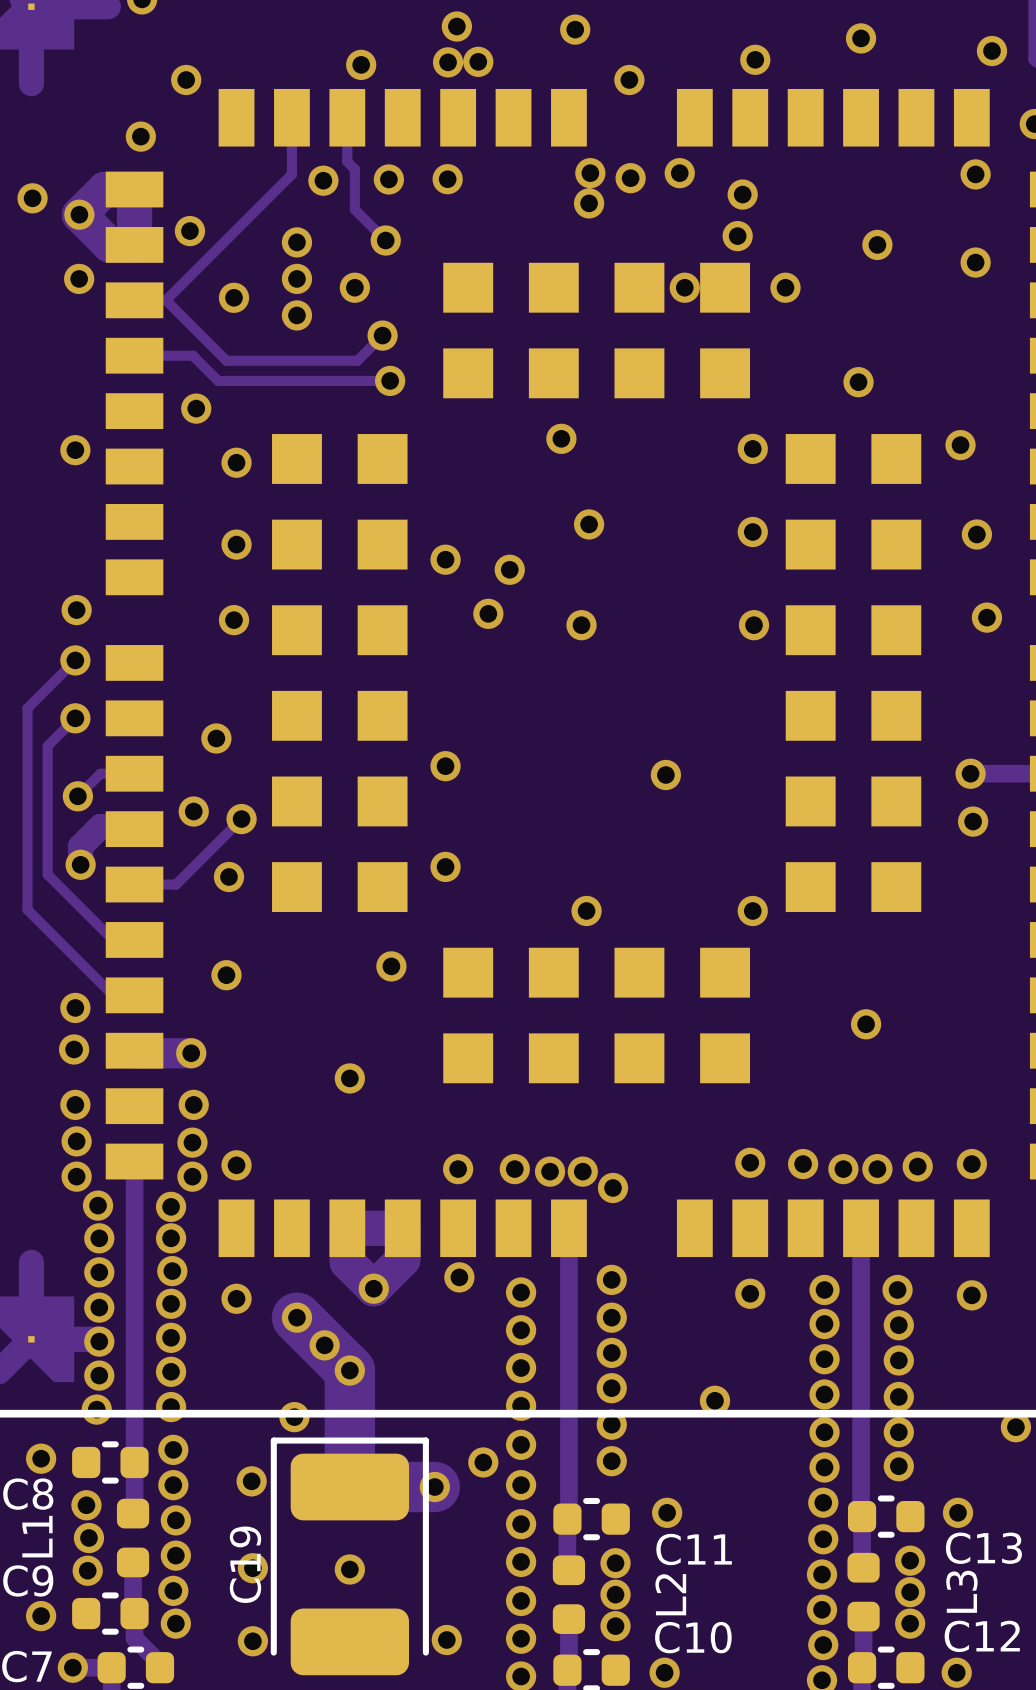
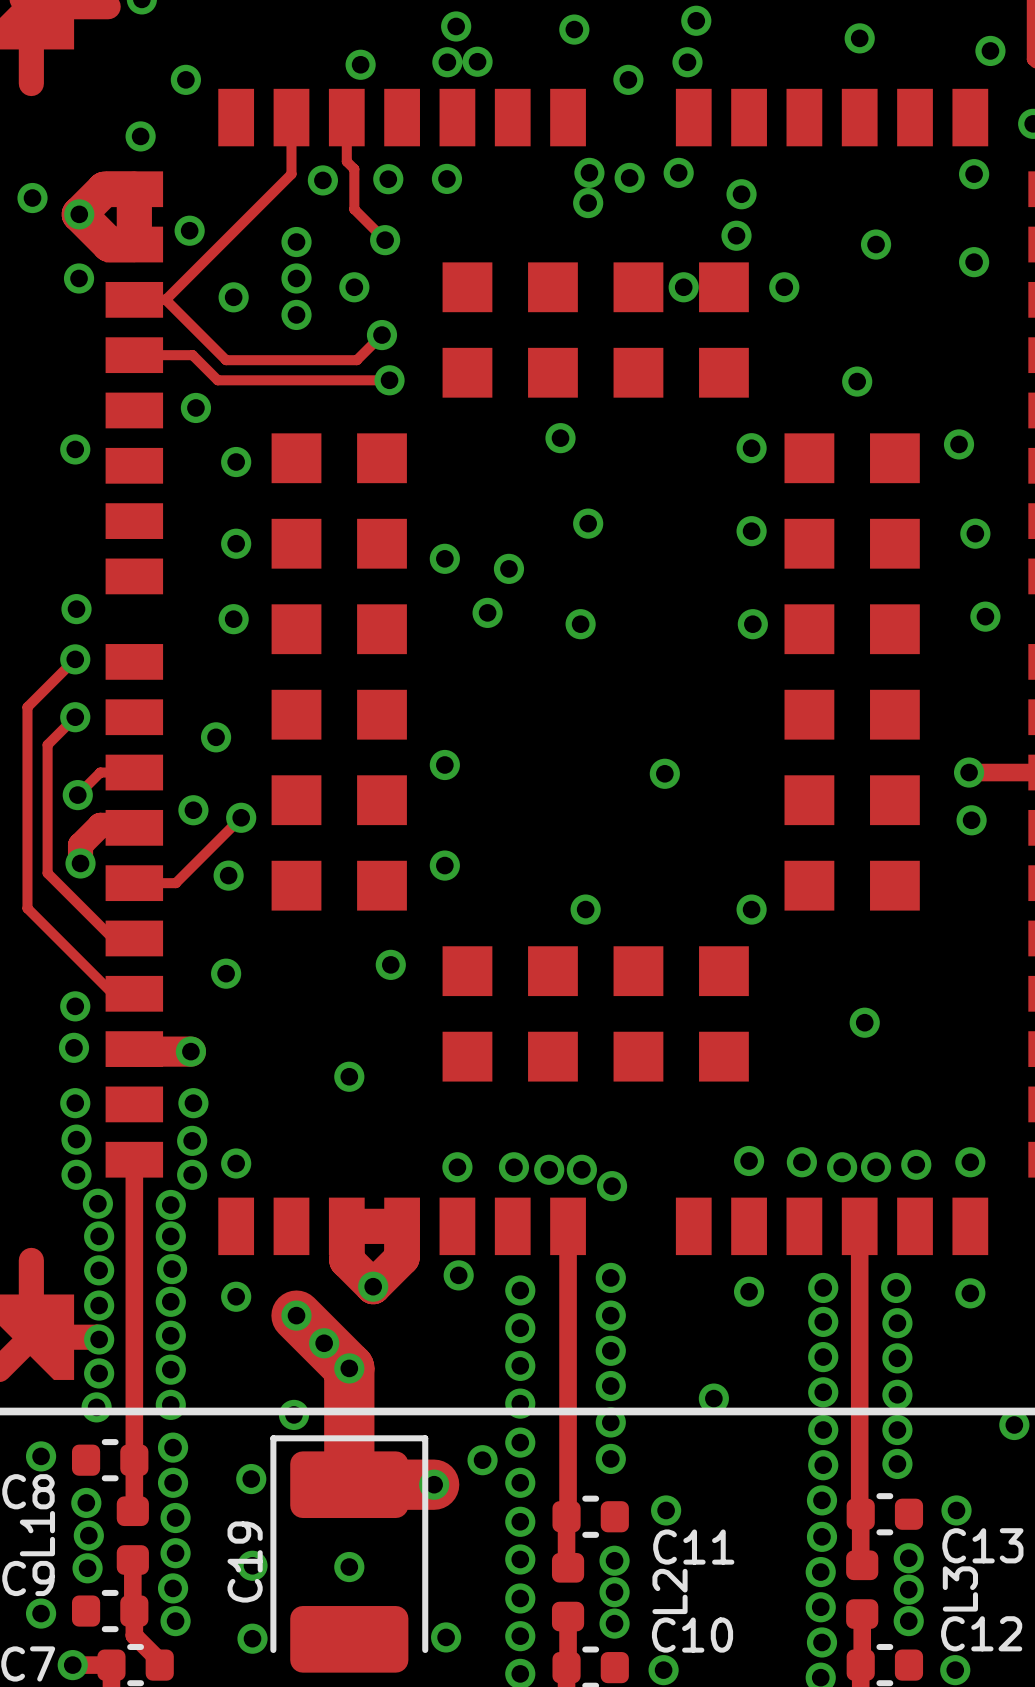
via: none -> (696, 20)
via: (755, 59) -> none
via: none -> (687, 62)

